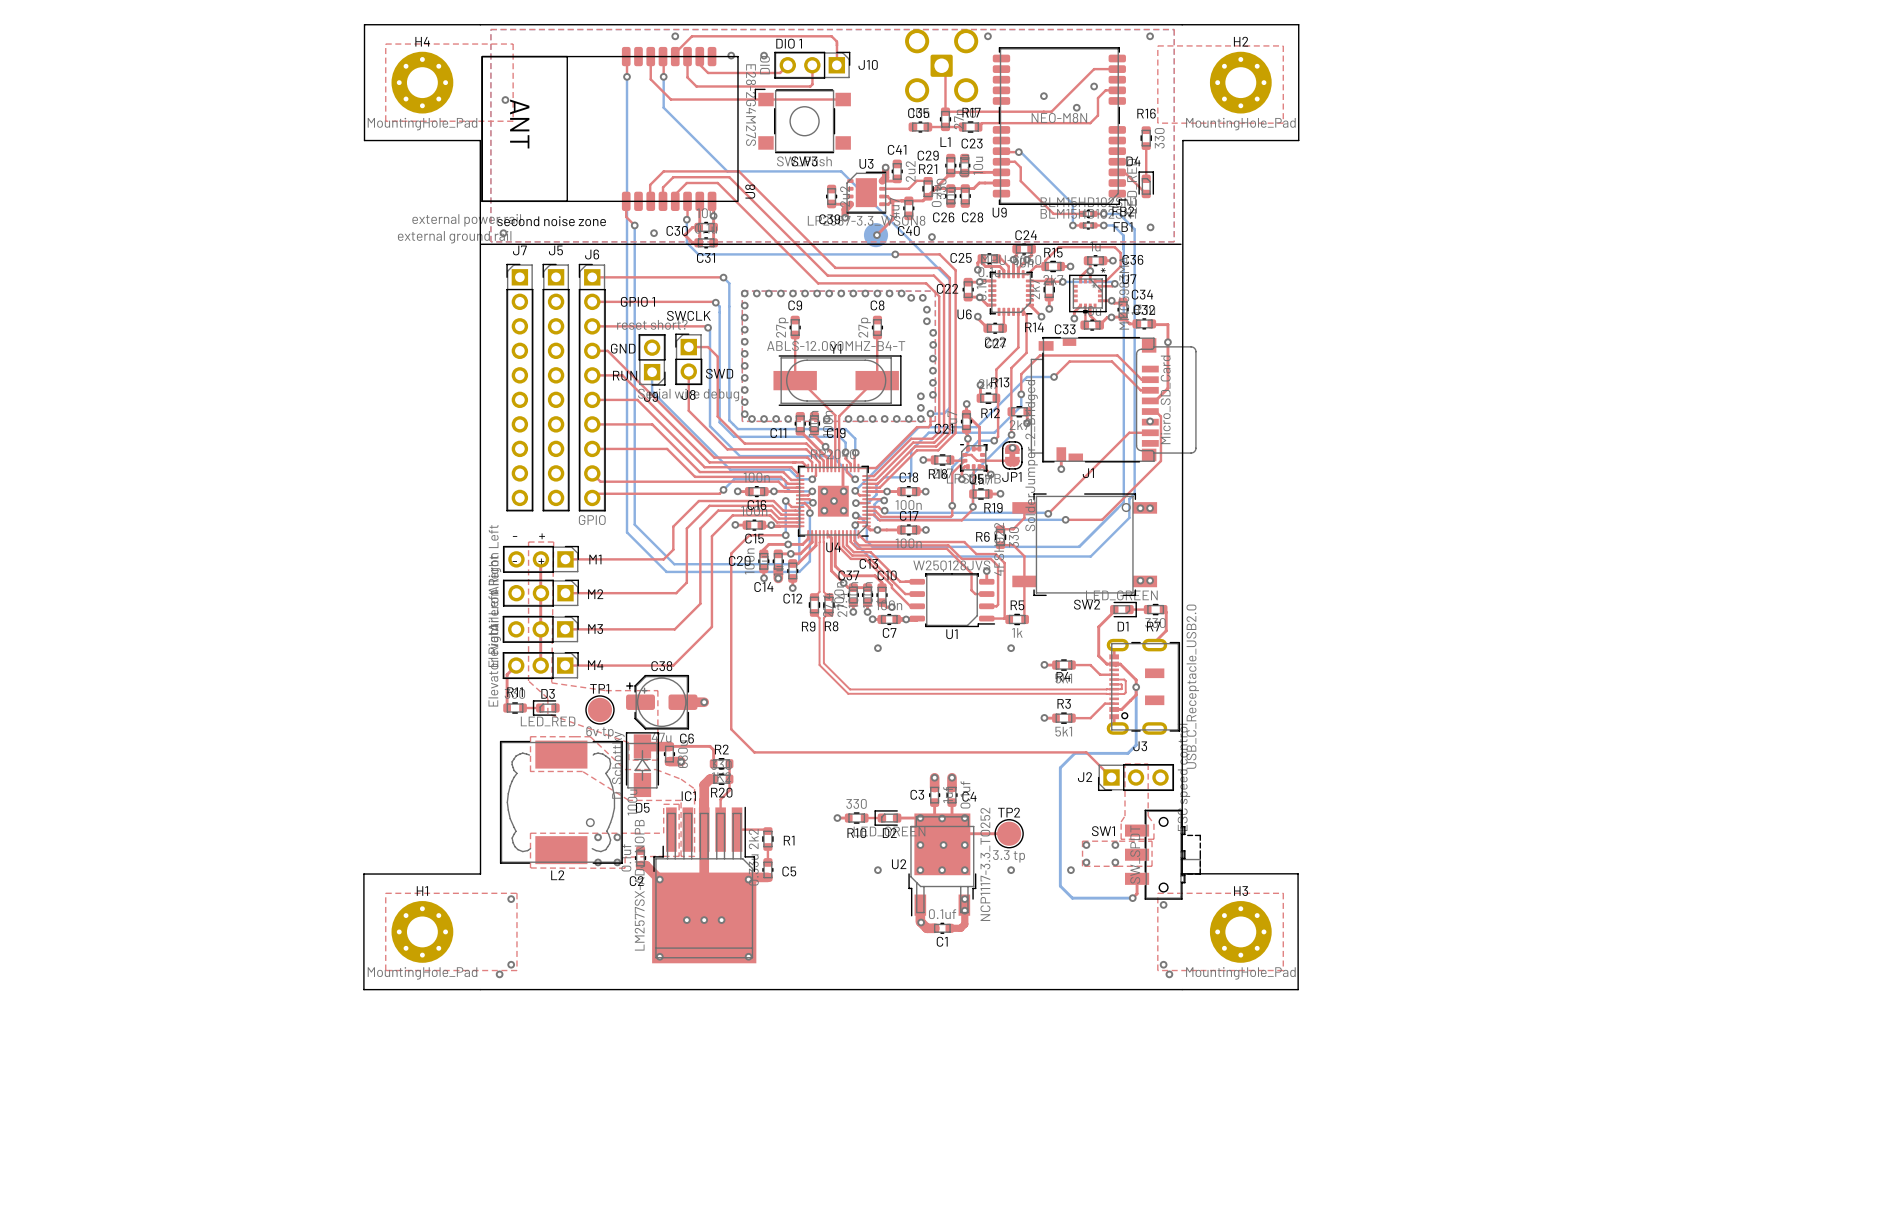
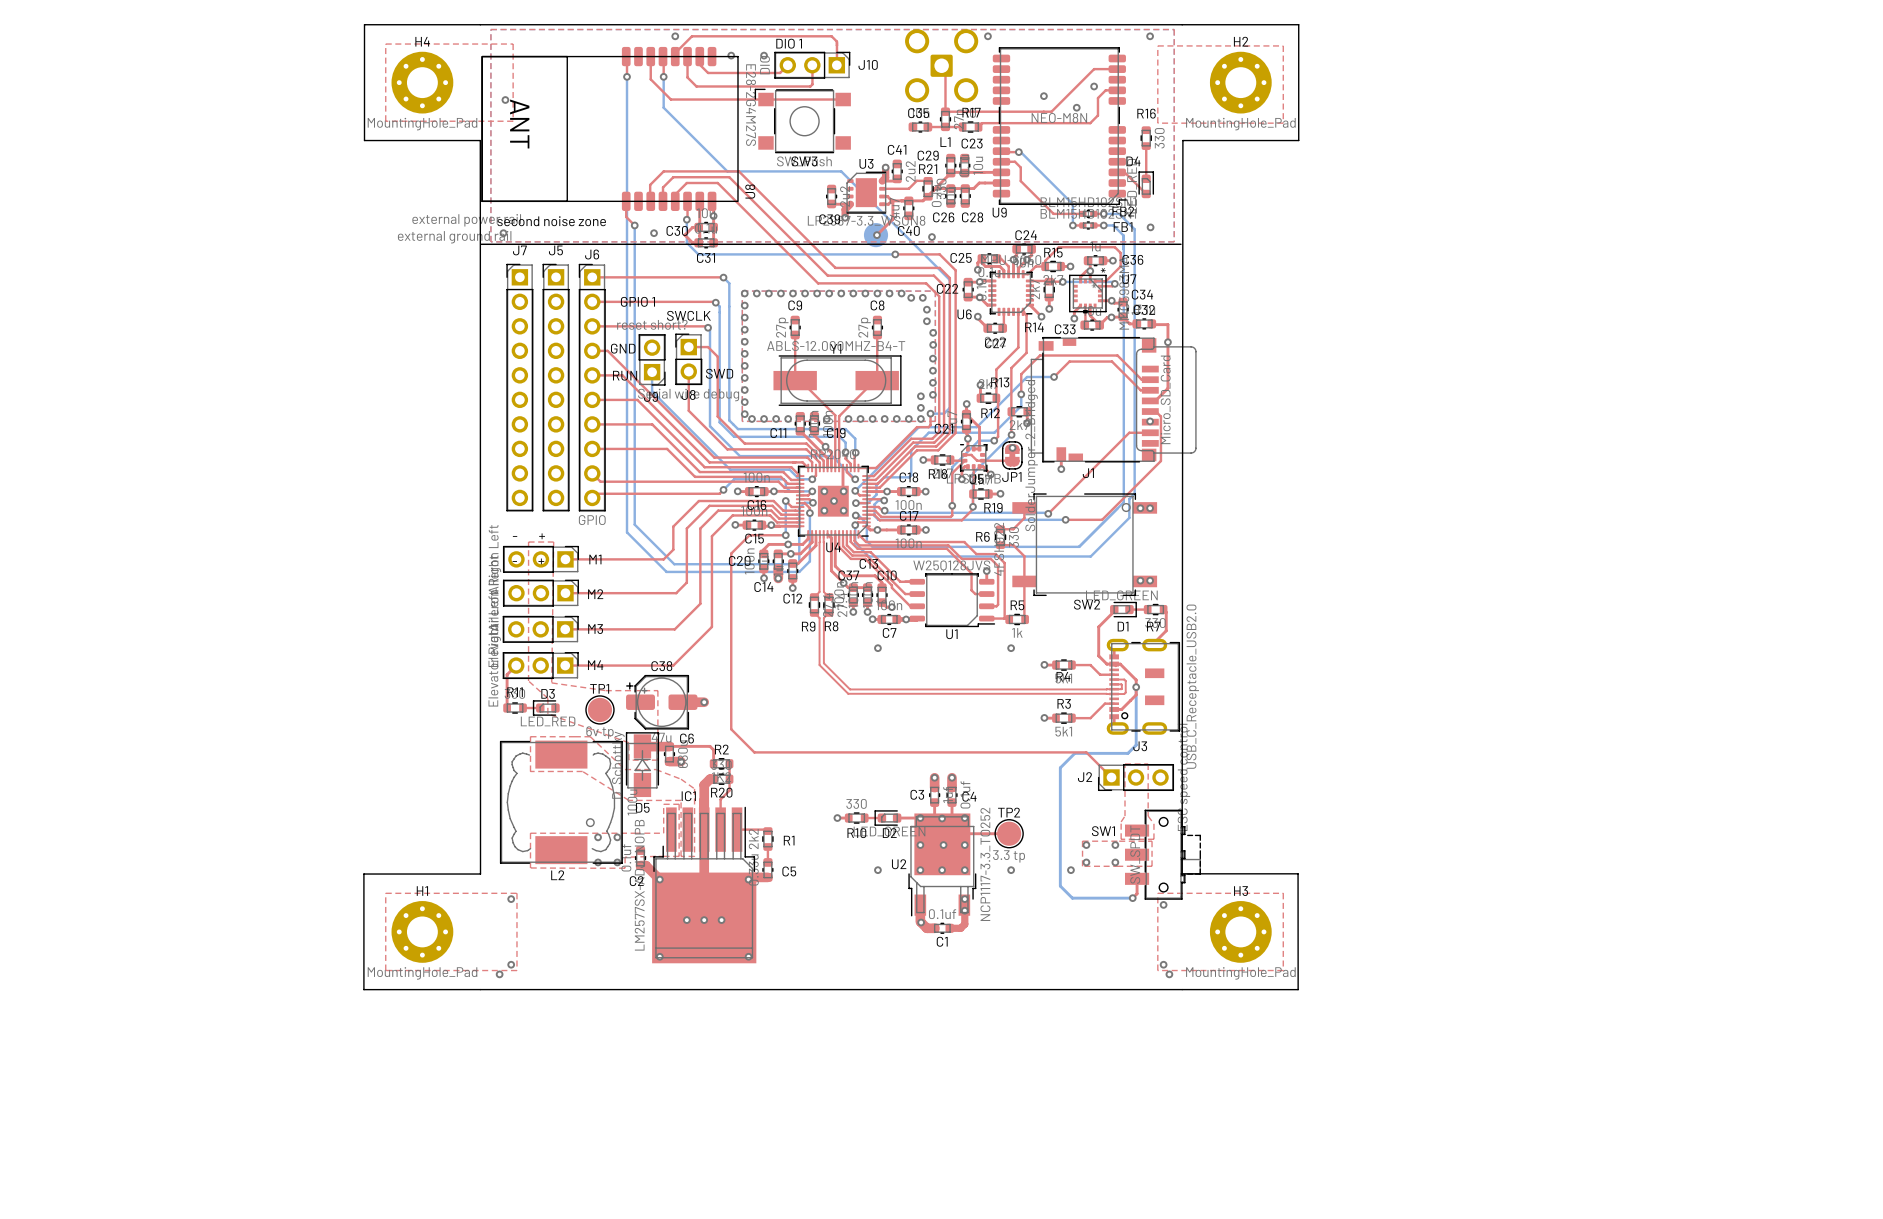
top track: (540, 559) (540, 665) -> none

